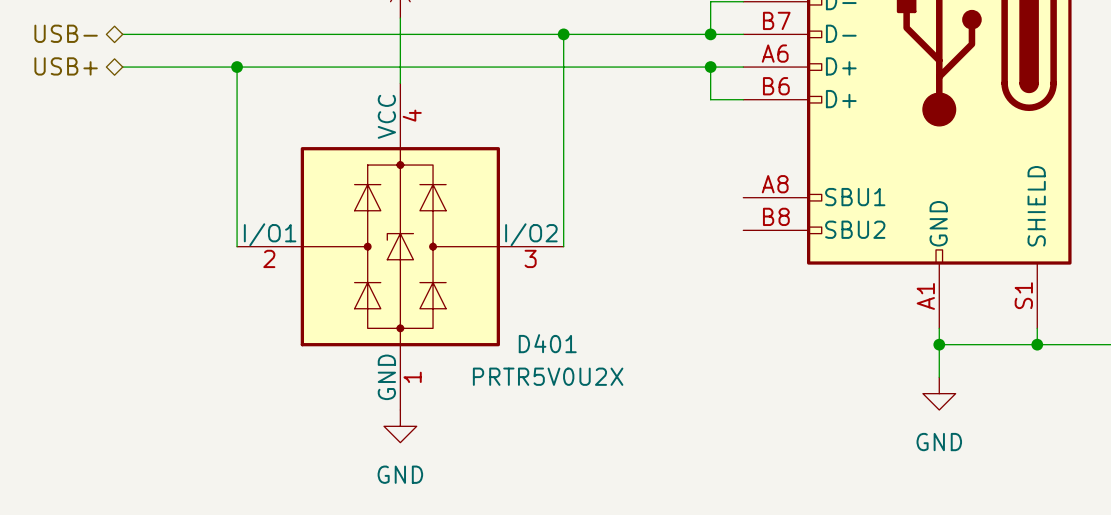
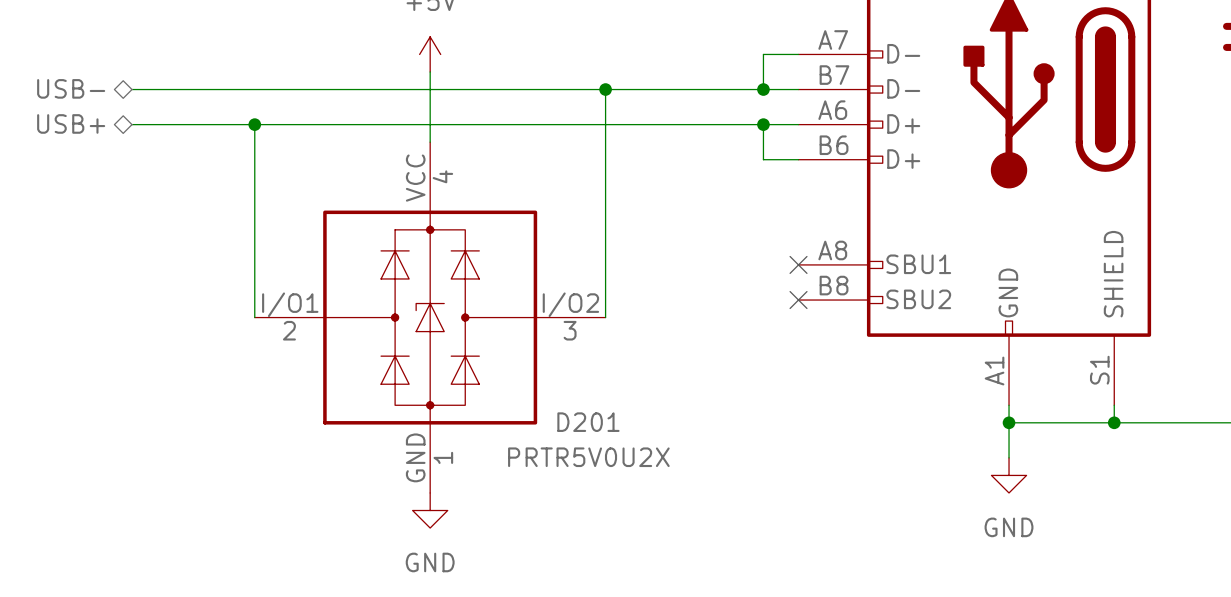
no-connect mark: none -> (798, 264)
no-connect mark: none -> (798, 300)
D401 name: D401 (547, 343) -> D201 (588, 422)

